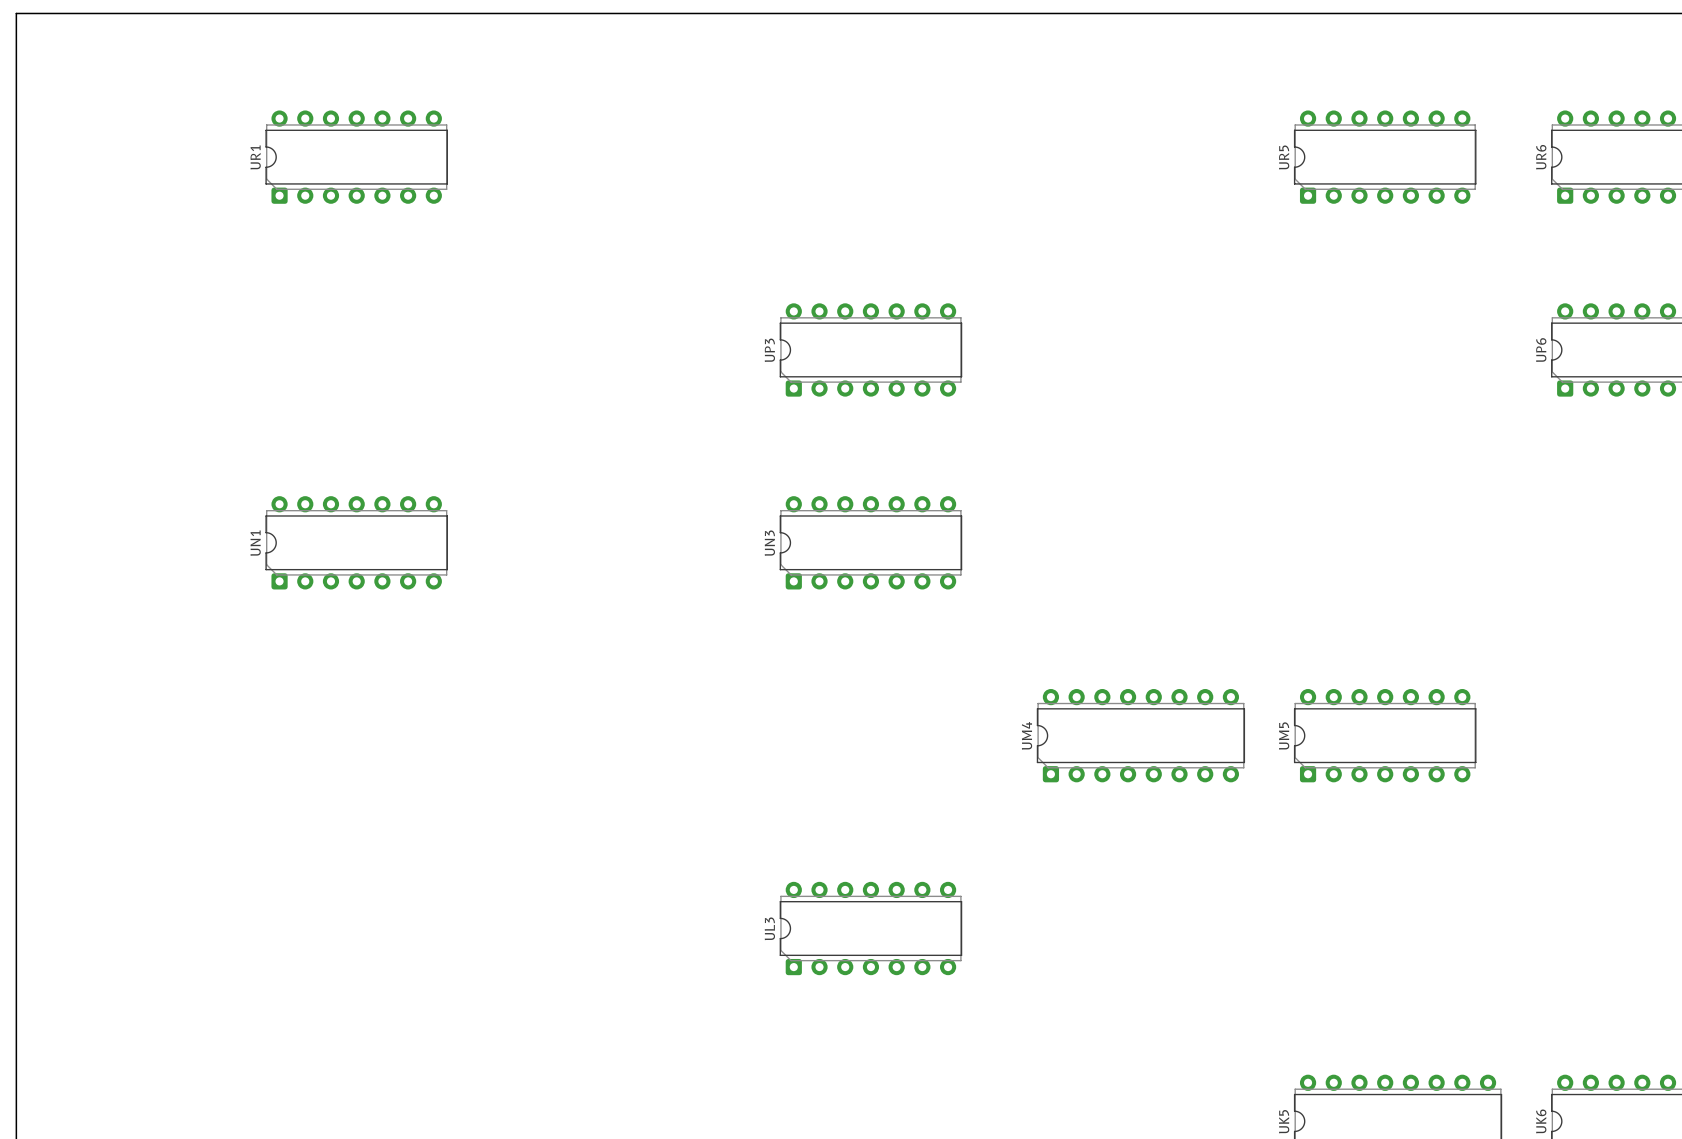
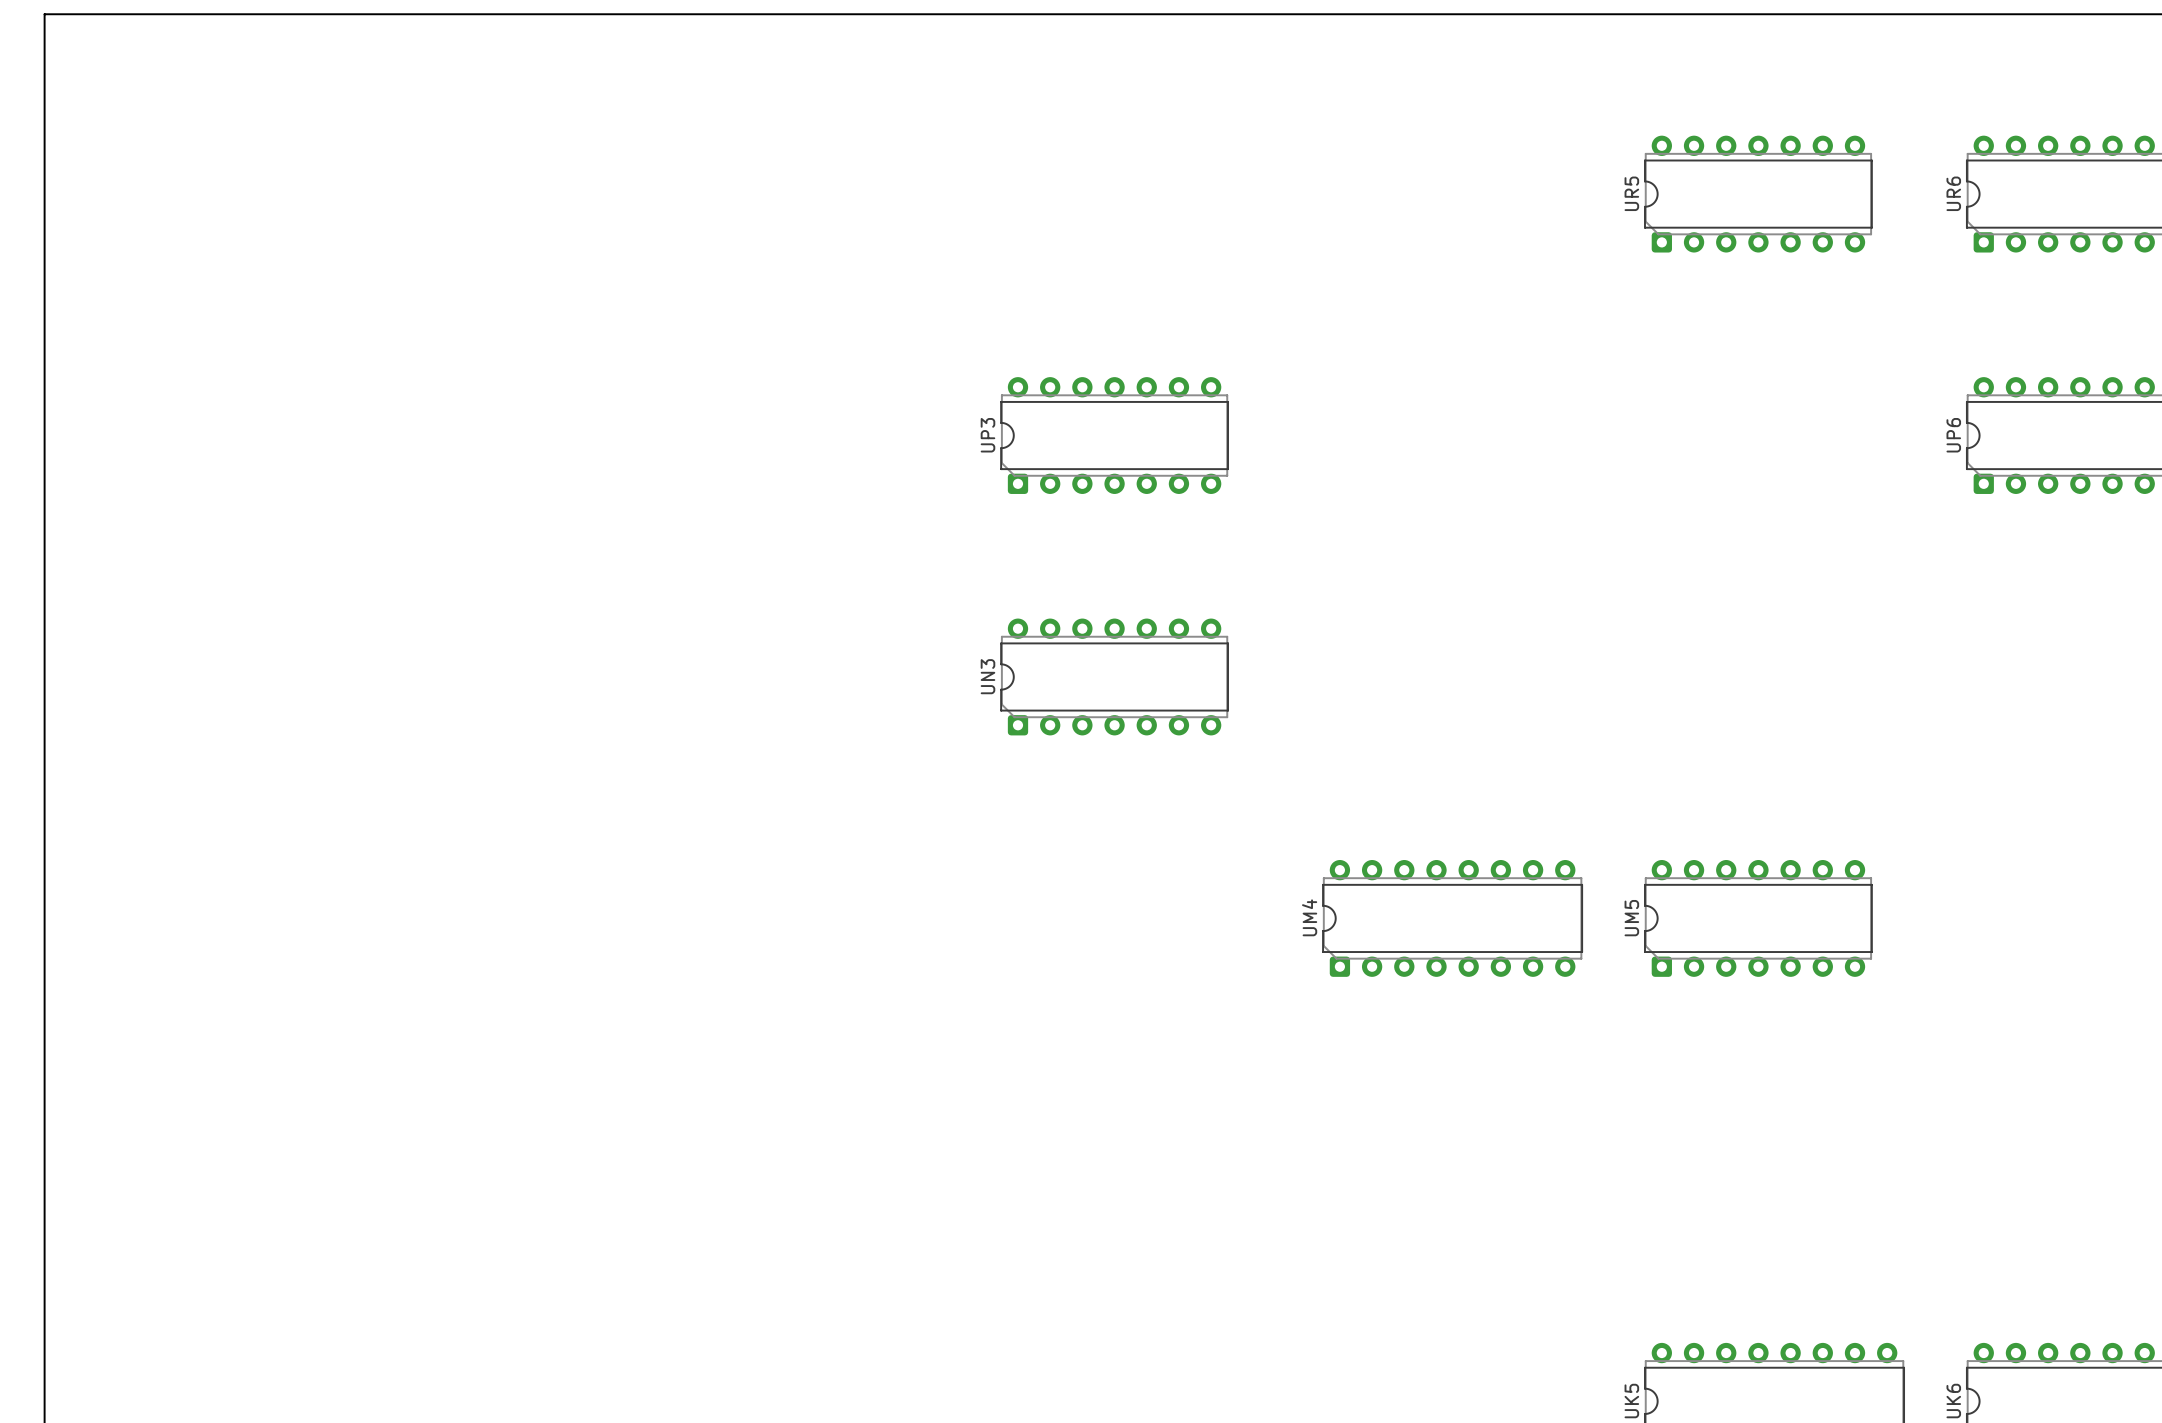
UR1: (356, 157) -> none
UN1: (356, 542) -> none
UL3: (870, 928) -> none

